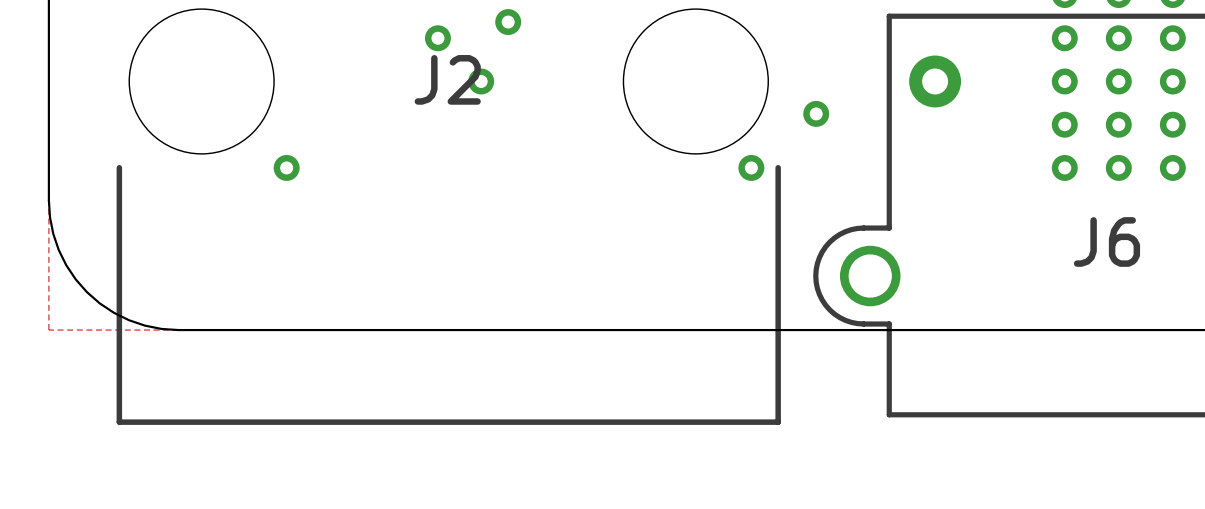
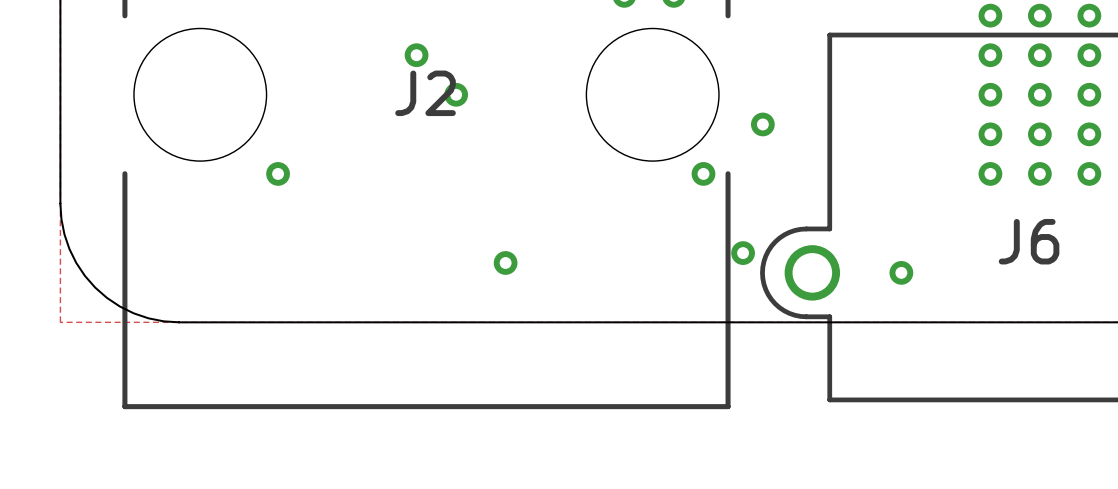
via: (508, 22) -> none
via: (935, 81) -> none
via: none -> (743, 253)
via: none -> (505, 262)
via: none -> (901, 272)

